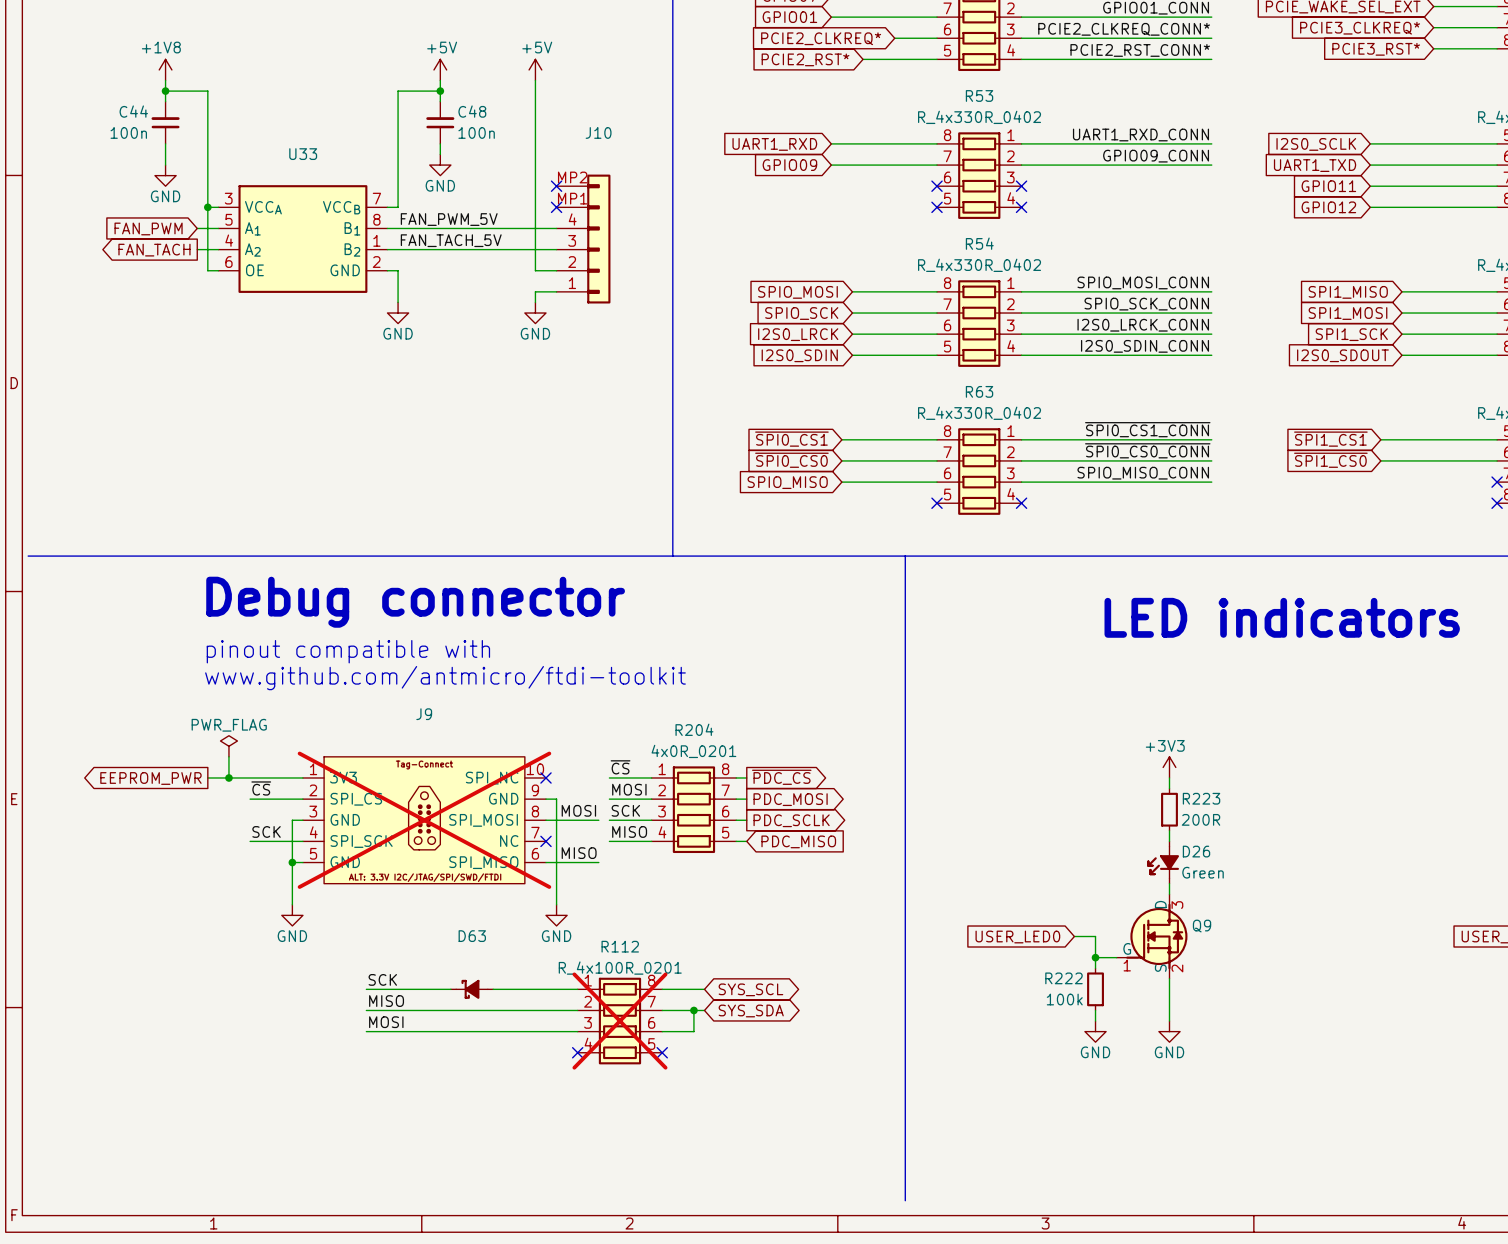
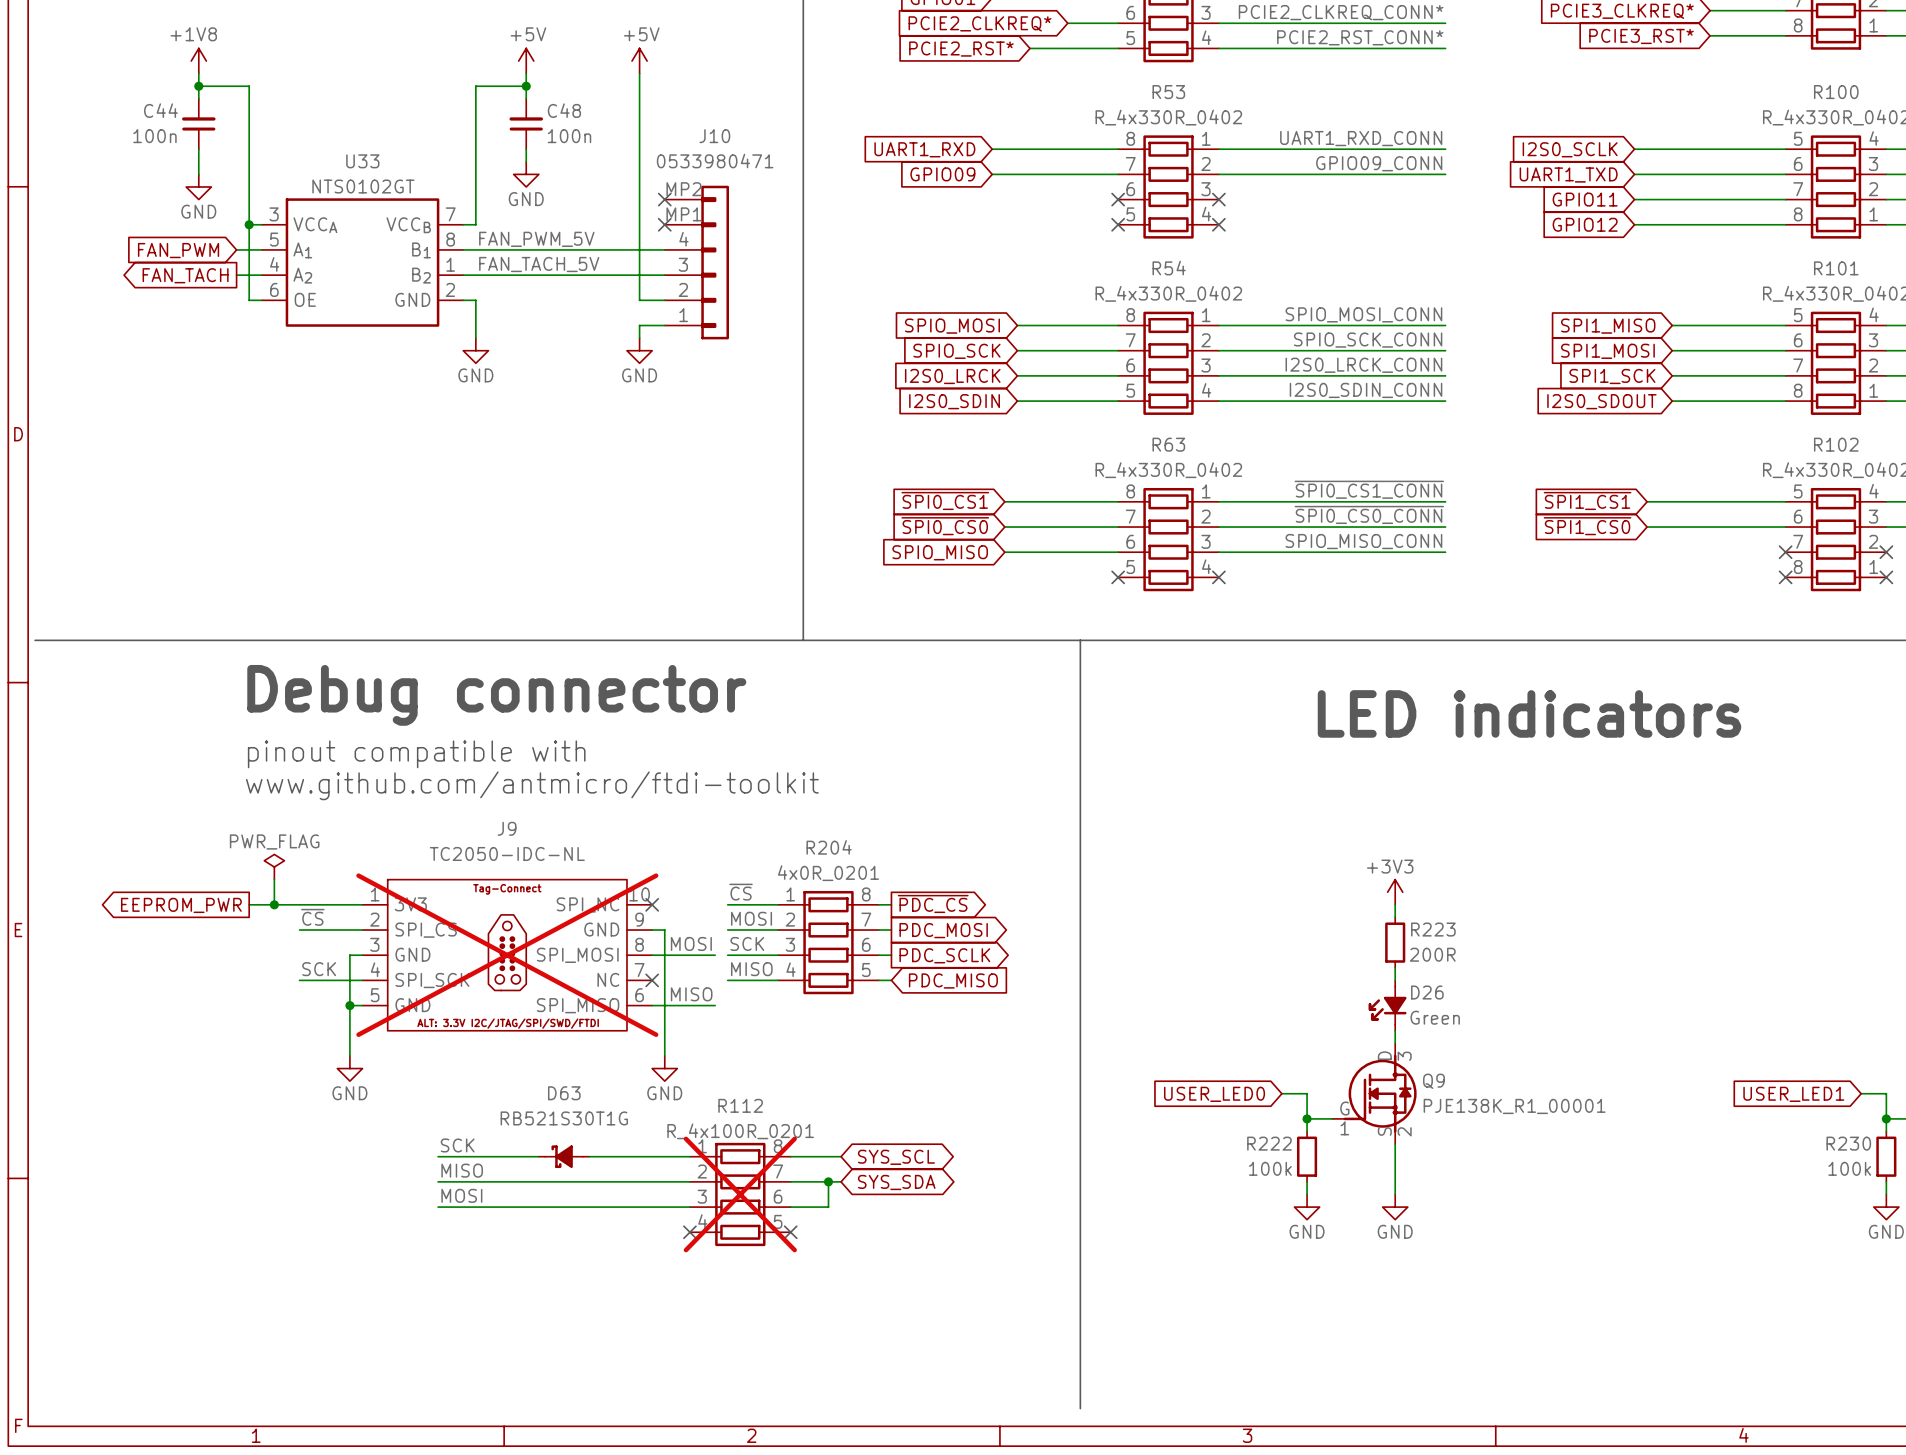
J10 text: none -> 0533980471 (715, 161)
U33 text: none -> NTS0102GT (363, 186)
J9 text: none -> TC2050-IDC-NL (507, 853)
Q9 text: none -> PJE138K_R1_00001 (1514, 1106)
D63 text: none -> RB521S30T1G (564, 1118)

